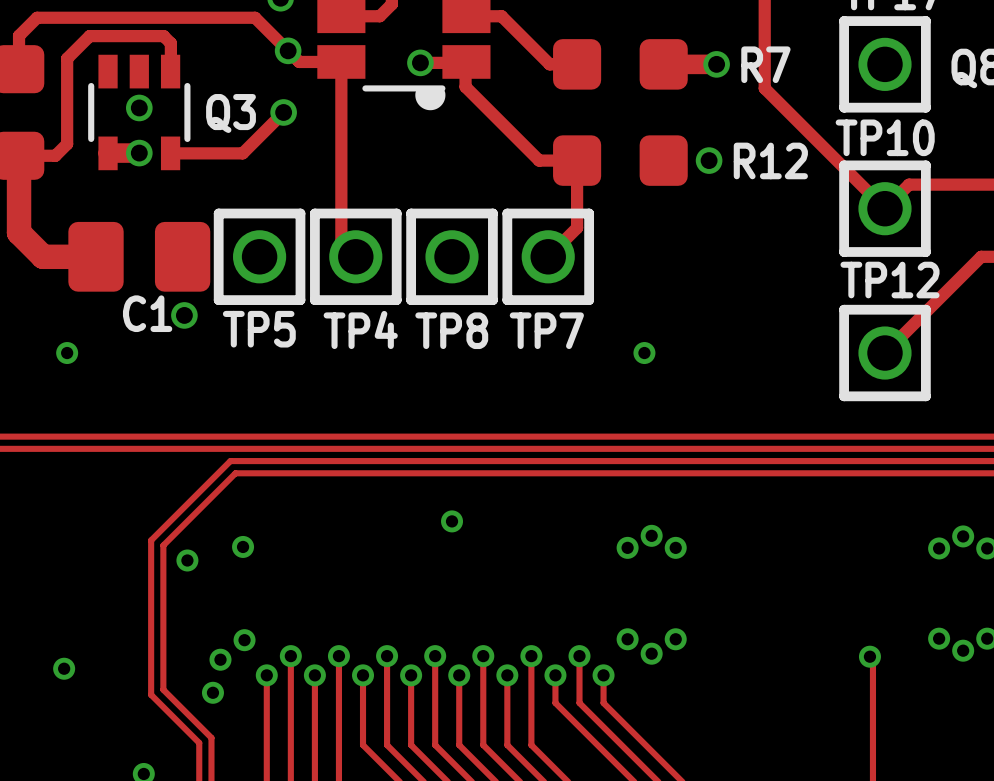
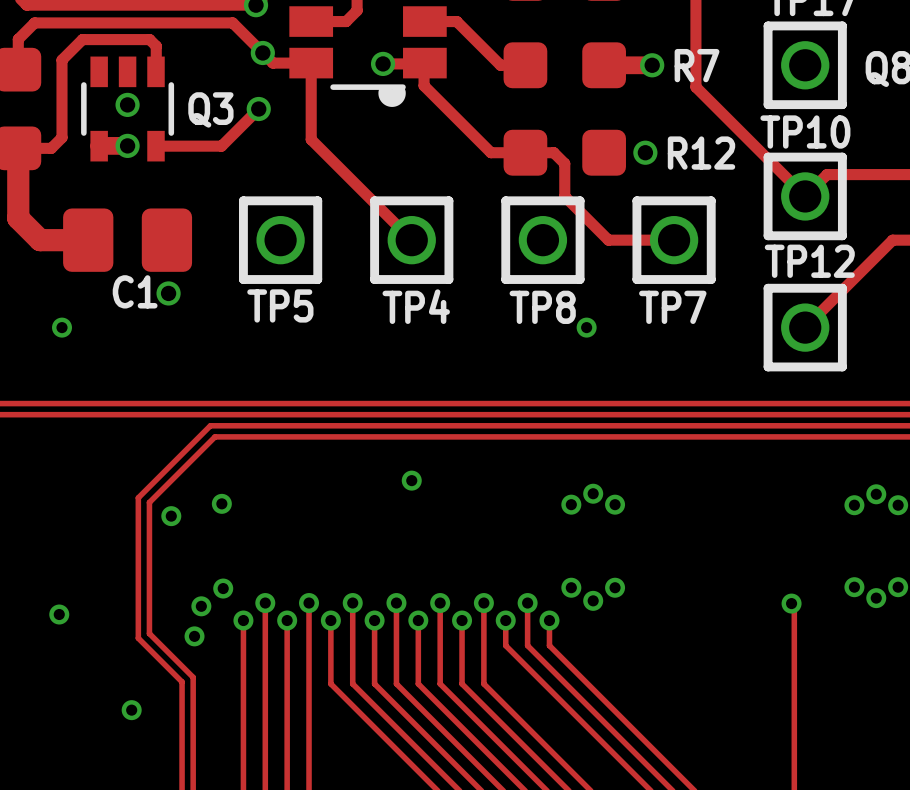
track: (341, 146) (341, 242) (355, 256) -> (311, 139) (411, 240)
track: (577, 160) (577, 227) (548, 256) -> (525, 152) (553, 152) (564, 163) (564, 196) (608, 240) (674, 240)
TP5 position: (259, 256) -> (280, 240)
TP4: (355, 256) -> none
TP7 position: (548, 256) -> (674, 240)
TP8: none -> (542, 240)
TP8 name: TP8 (451, 330) -> TP4 (416, 306)

